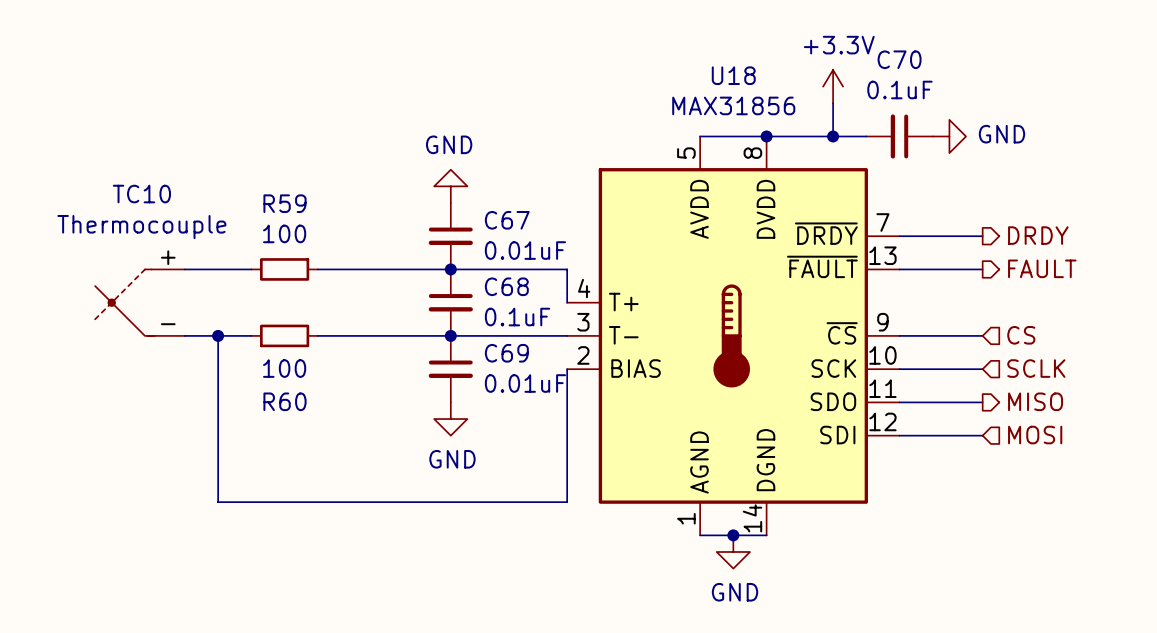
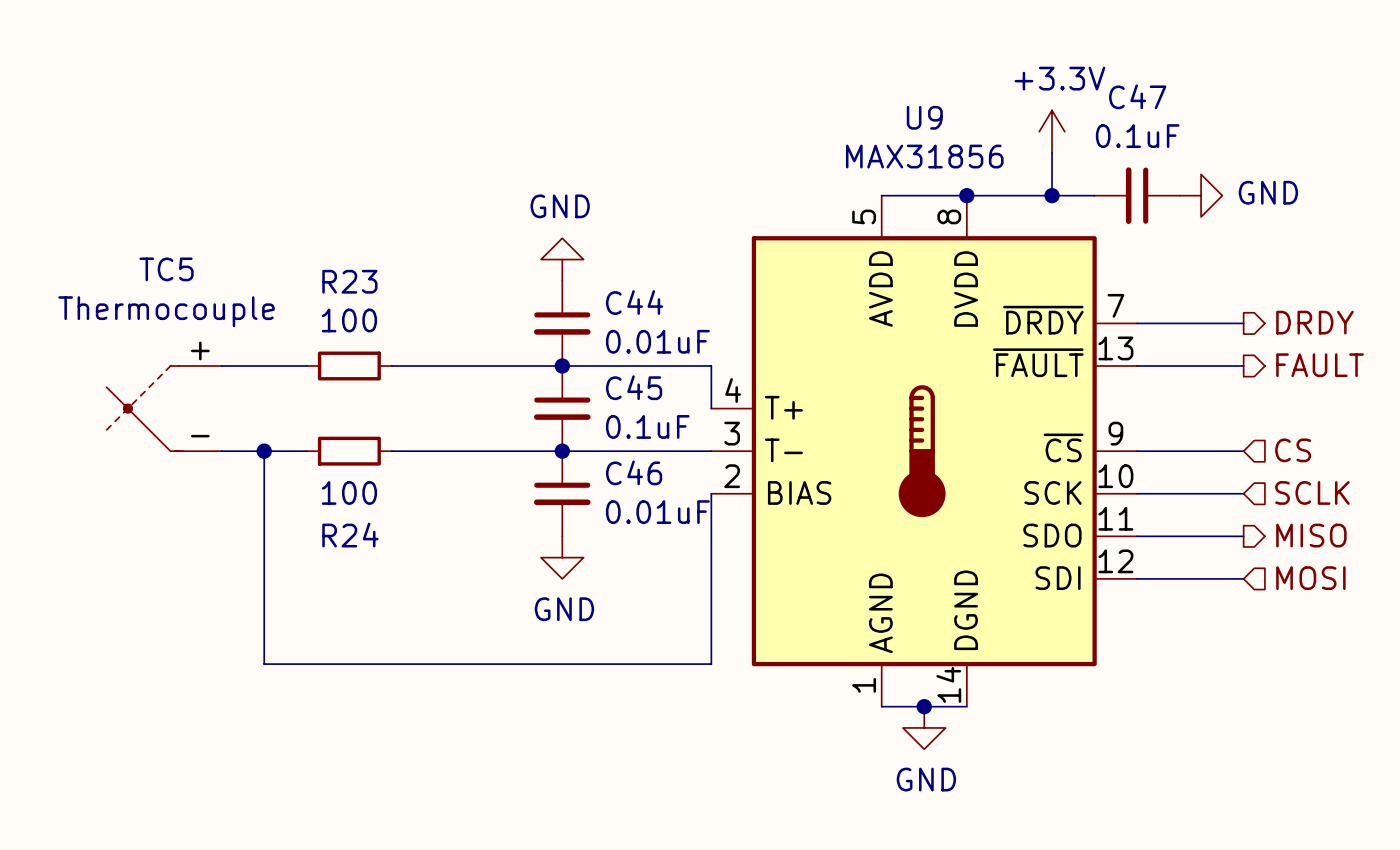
C70 name: C70 (899, 59) -> C47 (1137, 96)
U18 name: U18 (733, 75) -> U9 (924, 117)
TC10 name: TC10 (141, 194) -> TC5 (166, 269)
R59 name: R59 (285, 203) -> R23 (349, 281)
C67 name: C67 (507, 220) -> C44 (634, 302)
C68 name: C68 (506, 286) -> C45 (634, 387)
C69 name: C69 (506, 353) -> C46 (634, 472)
R60 name: R60 (285, 401) -> R24 (350, 535)

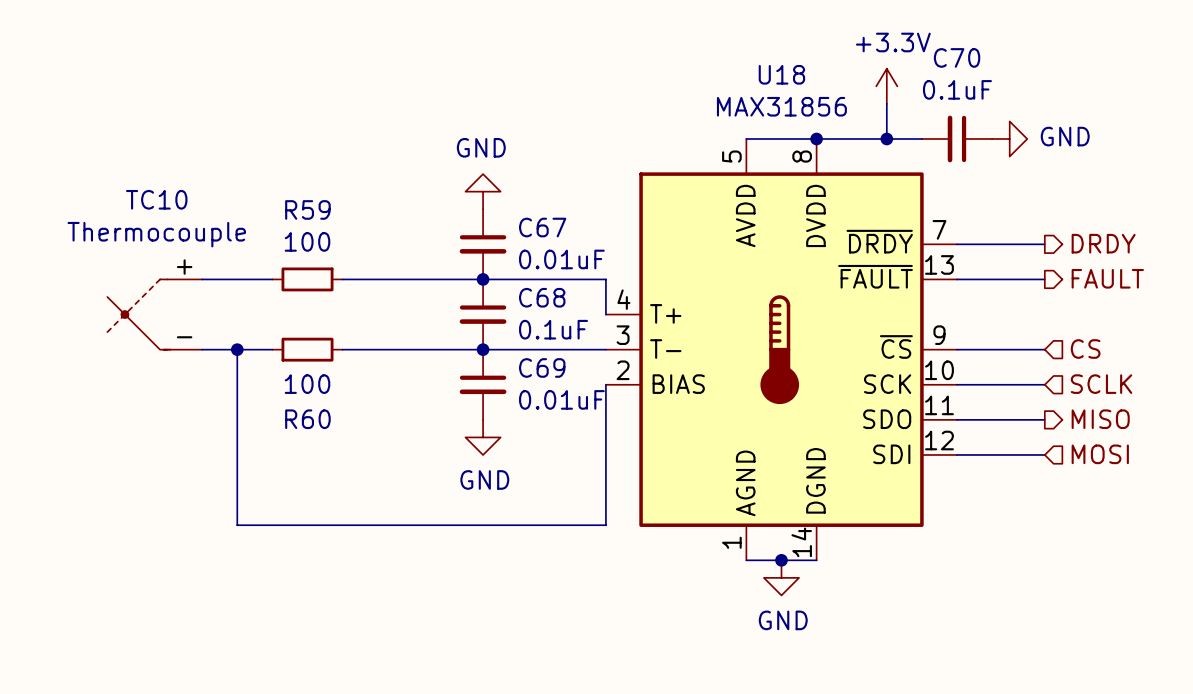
C47 name: C47 (1137, 96) -> C70 (957, 57)
U9 name: U9 (924, 117) -> U18 (781, 74)
TC5 name: TC5 (166, 269) -> TC10 (156, 199)
R23 name: R23 (349, 281) -> R59 (307, 209)
C44 name: C44 (634, 302) -> C67 (542, 227)
C45 name: C45 (634, 387) -> C68 (542, 297)
C46 name: C46 (634, 472) -> C69 (542, 367)
R24 name: R24 (350, 535) -> R60 (307, 419)

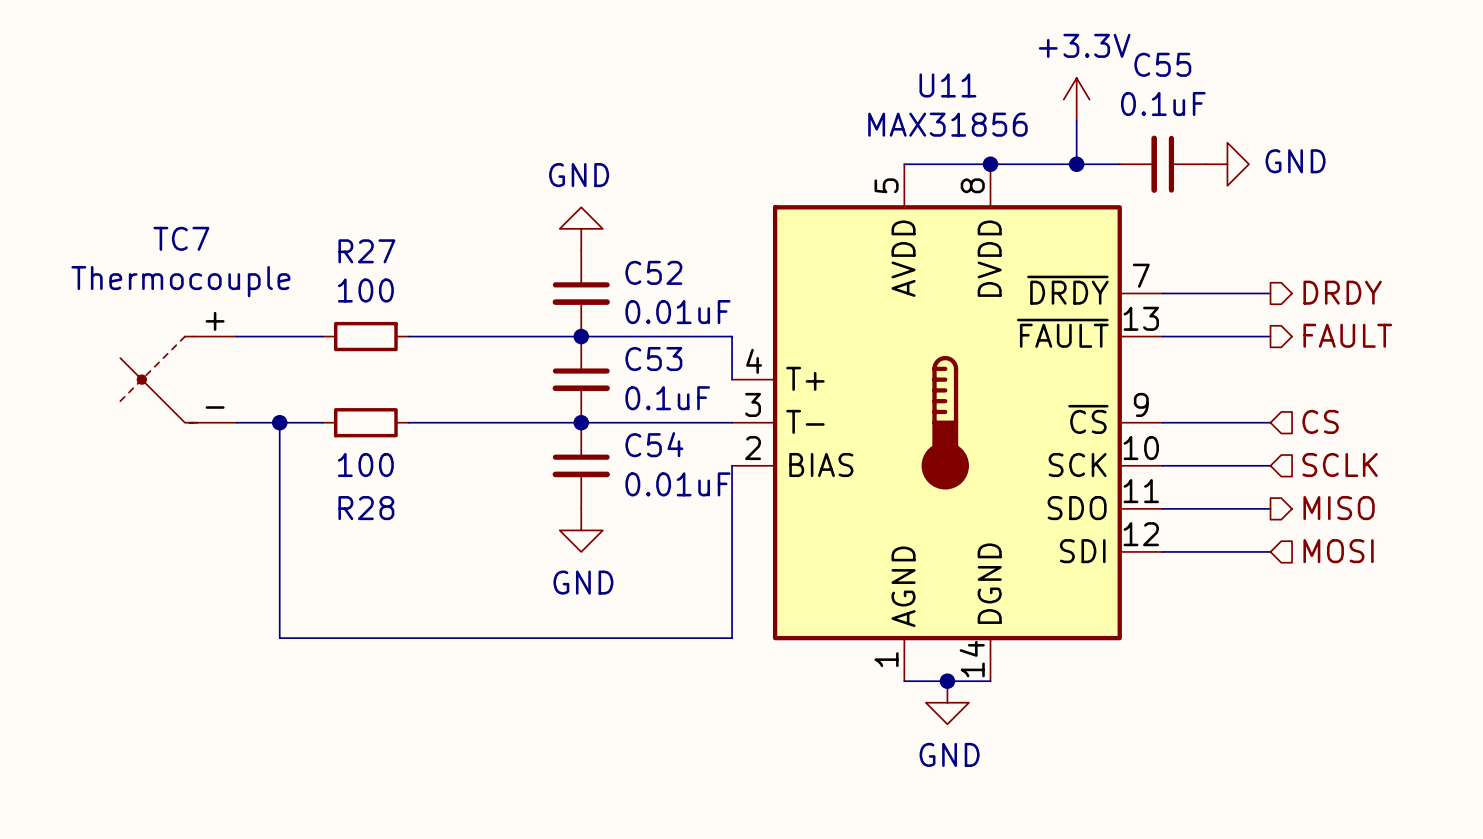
C70 name: C70 (957, 57) -> C55 (1162, 64)
U18 name: U18 (781, 74) -> U11 (947, 85)
TC10 name: TC10 (156, 199) -> TC7 (181, 238)
R59 name: R59 (307, 209) -> R27 (366, 251)
C67 name: C67 (542, 227) -> C52 (653, 272)
C68 name: C68 (542, 297) -> C53 (653, 359)
C69 name: C69 (542, 367) -> C54 (654, 444)
R60 name: R60 (307, 419) -> R28 (366, 508)

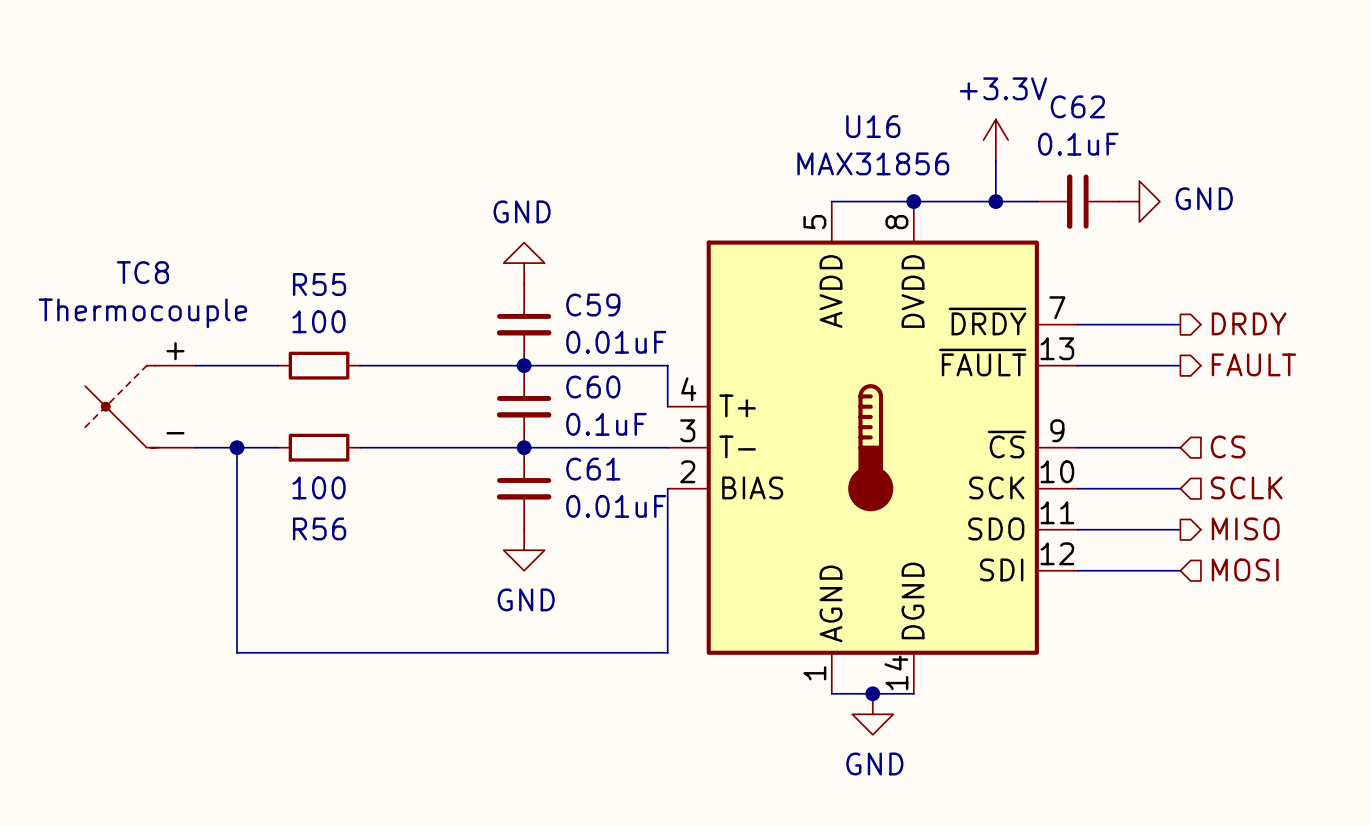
C55 name: C55 (1162, 64) -> C62 (1077, 106)
U11 name: U11 (947, 85) -> U16 (873, 126)
TC7 name: TC7 (181, 238) -> TC8 (142, 272)
R27 name: R27 (366, 251) -> R55 (319, 284)
C52 name: C52 (653, 272) -> C59 (593, 305)
C53 name: C53 (653, 359) -> C60 (593, 387)
C54 name: C54 (654, 444) -> C61 (593, 469)
R28 name: R28 (366, 508) -> R56 (319, 528)

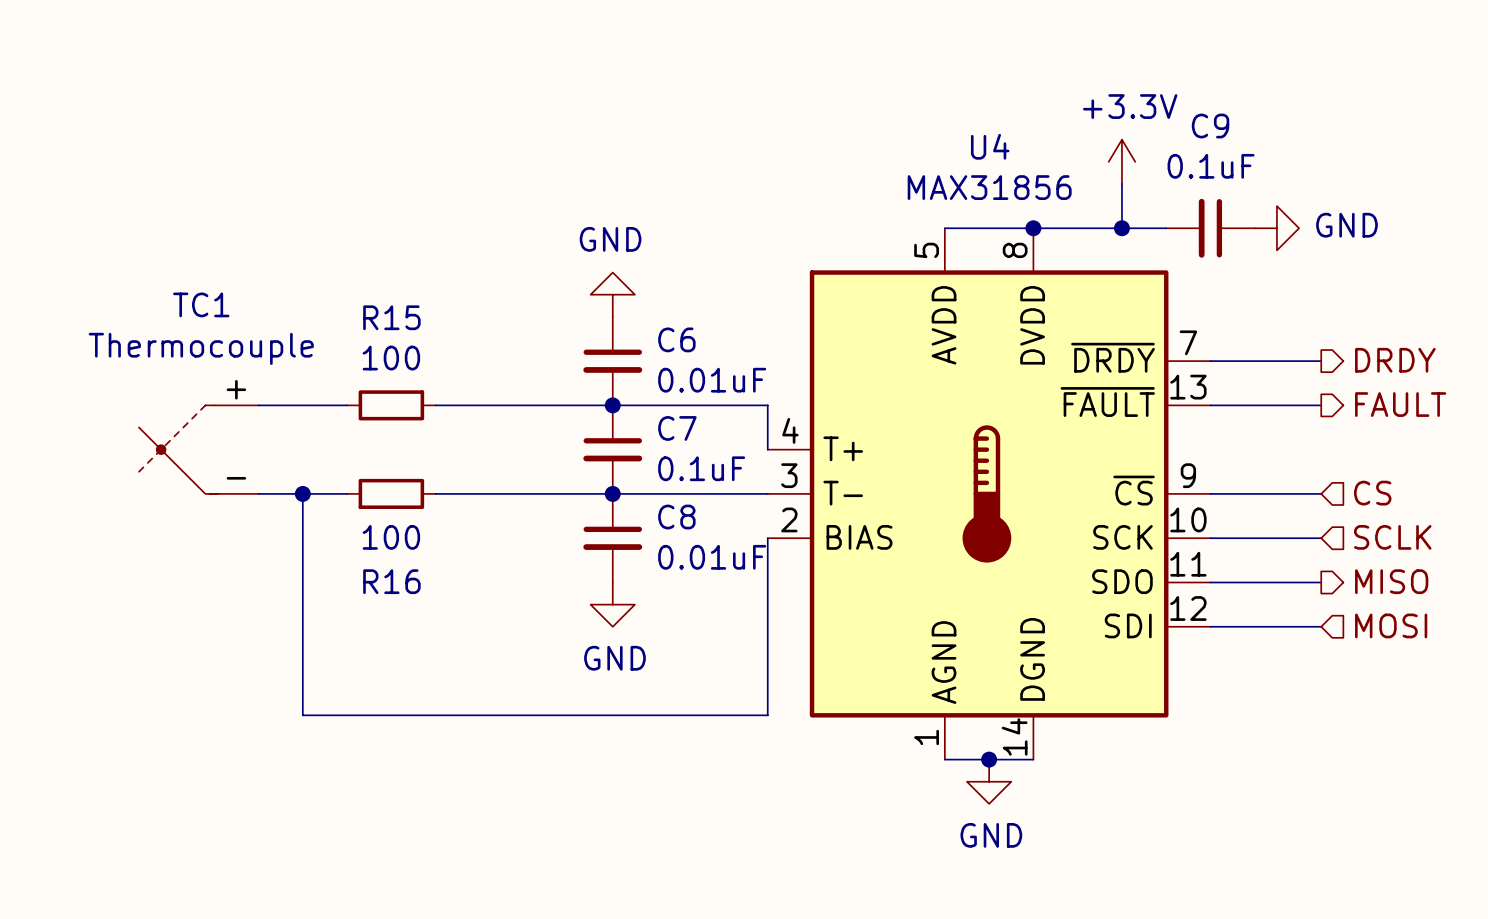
C62 name: C62 (1077, 106) -> C9 (1210, 126)
U16 name: U16 (873, 126) -> U4 (990, 146)
TC8 name: TC8 (142, 272) -> TC1 (201, 304)
R55 name: R55 (319, 284) -> R15 (391, 317)
C59 name: C59 (593, 305) -> C6 (676, 339)
C60 name: C60 (593, 387) -> C7 (677, 428)
C61 name: C61 (593, 469) -> C8 (676, 517)
R56 name: R56 (319, 528) -> R16 (391, 581)

